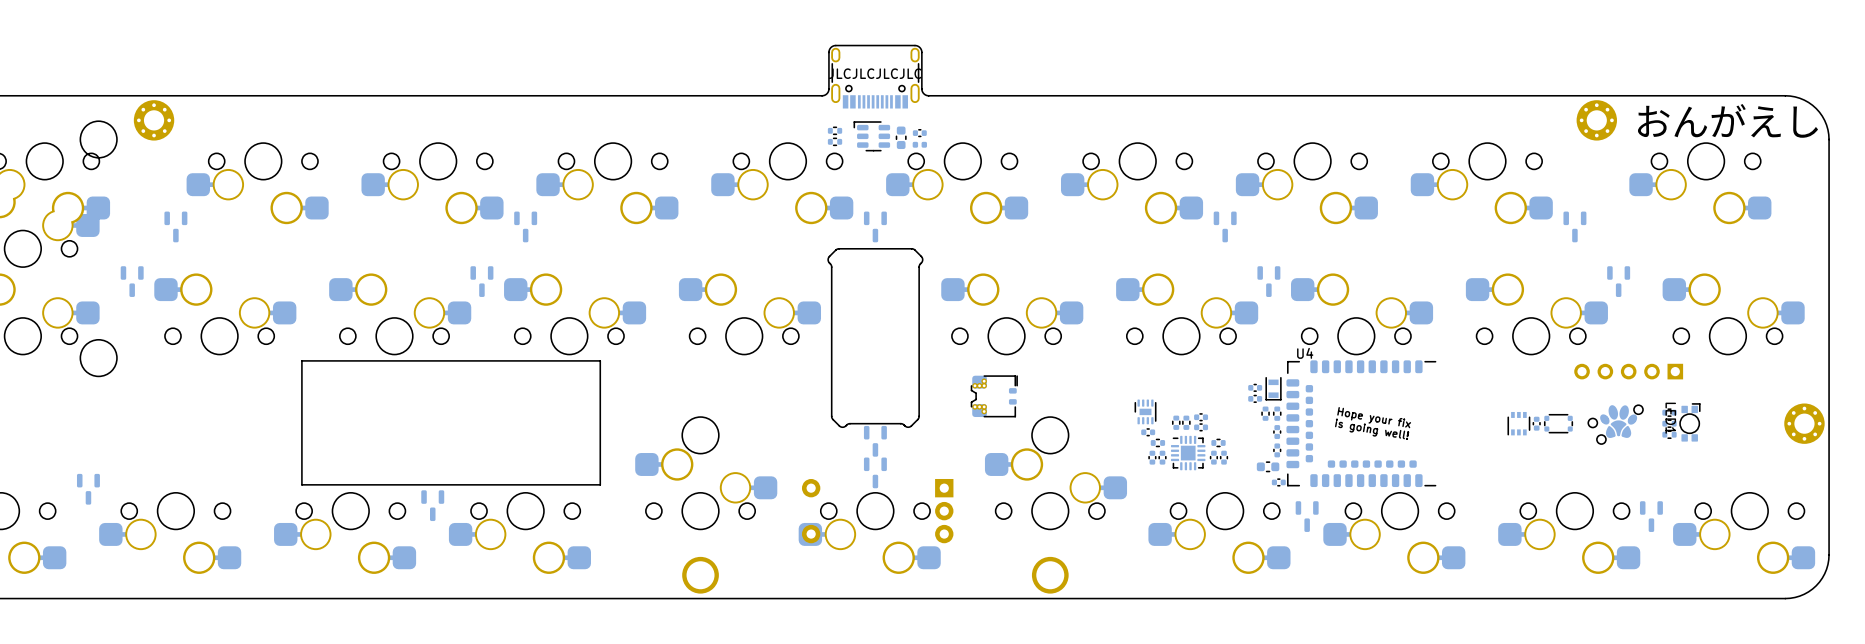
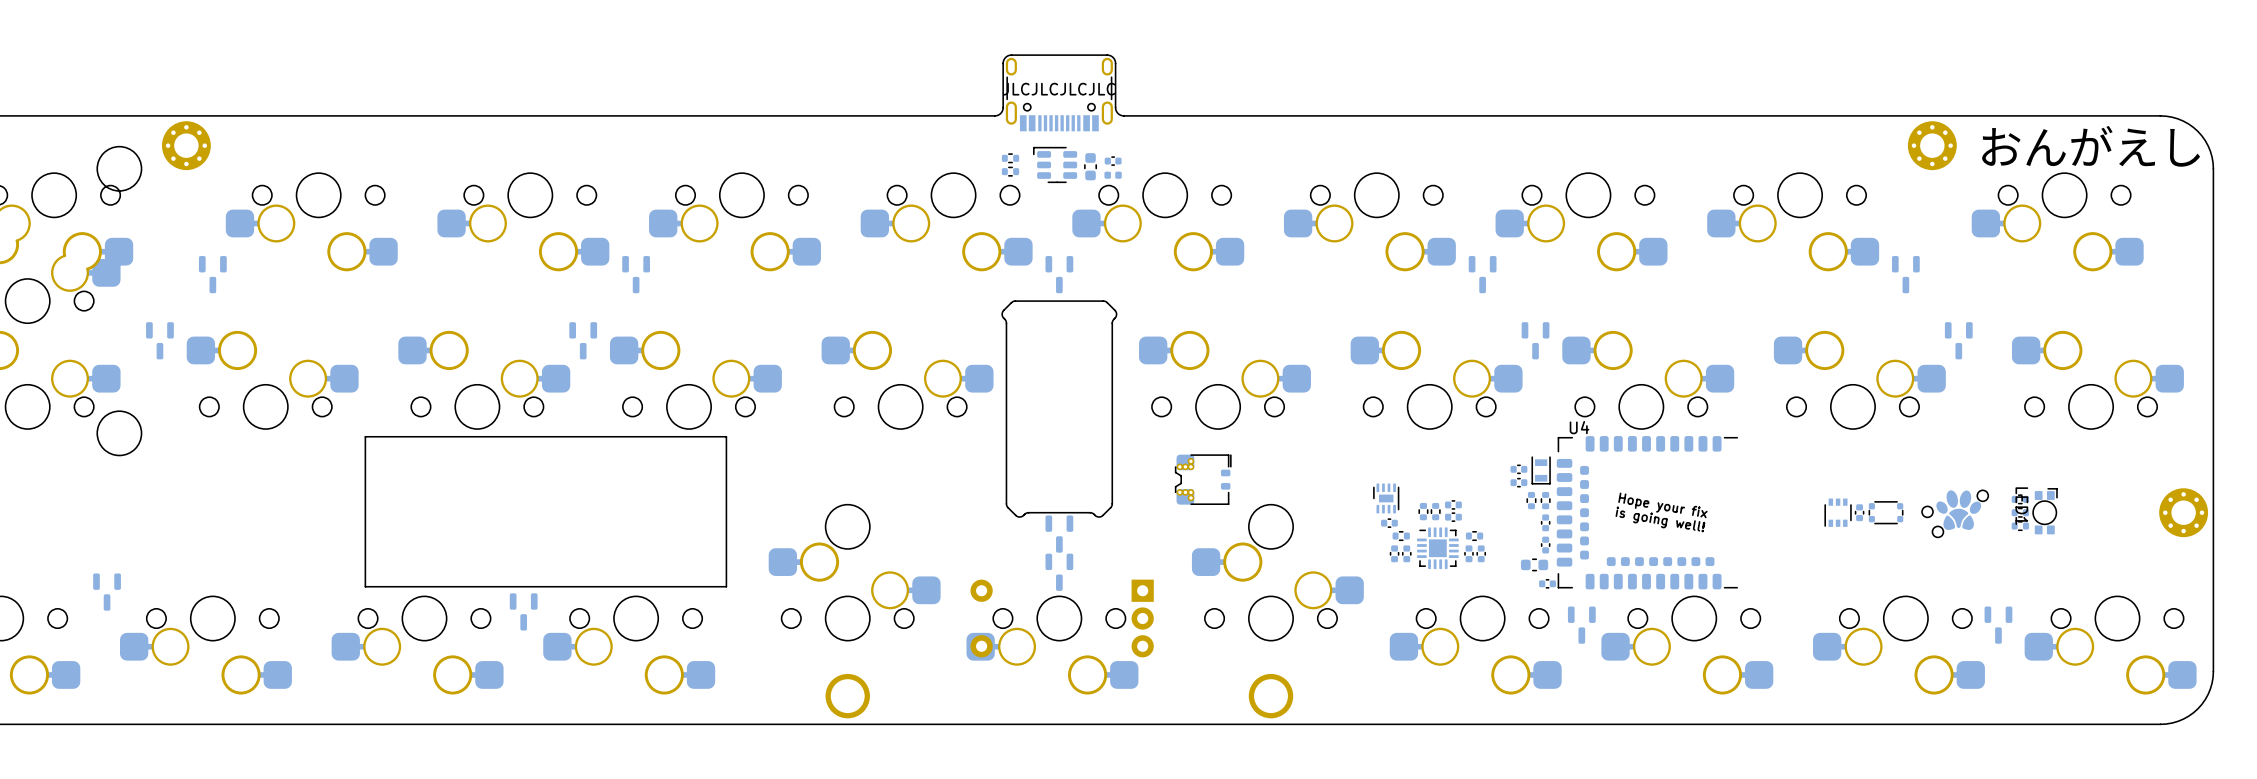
part: (1628, 371) -> none

